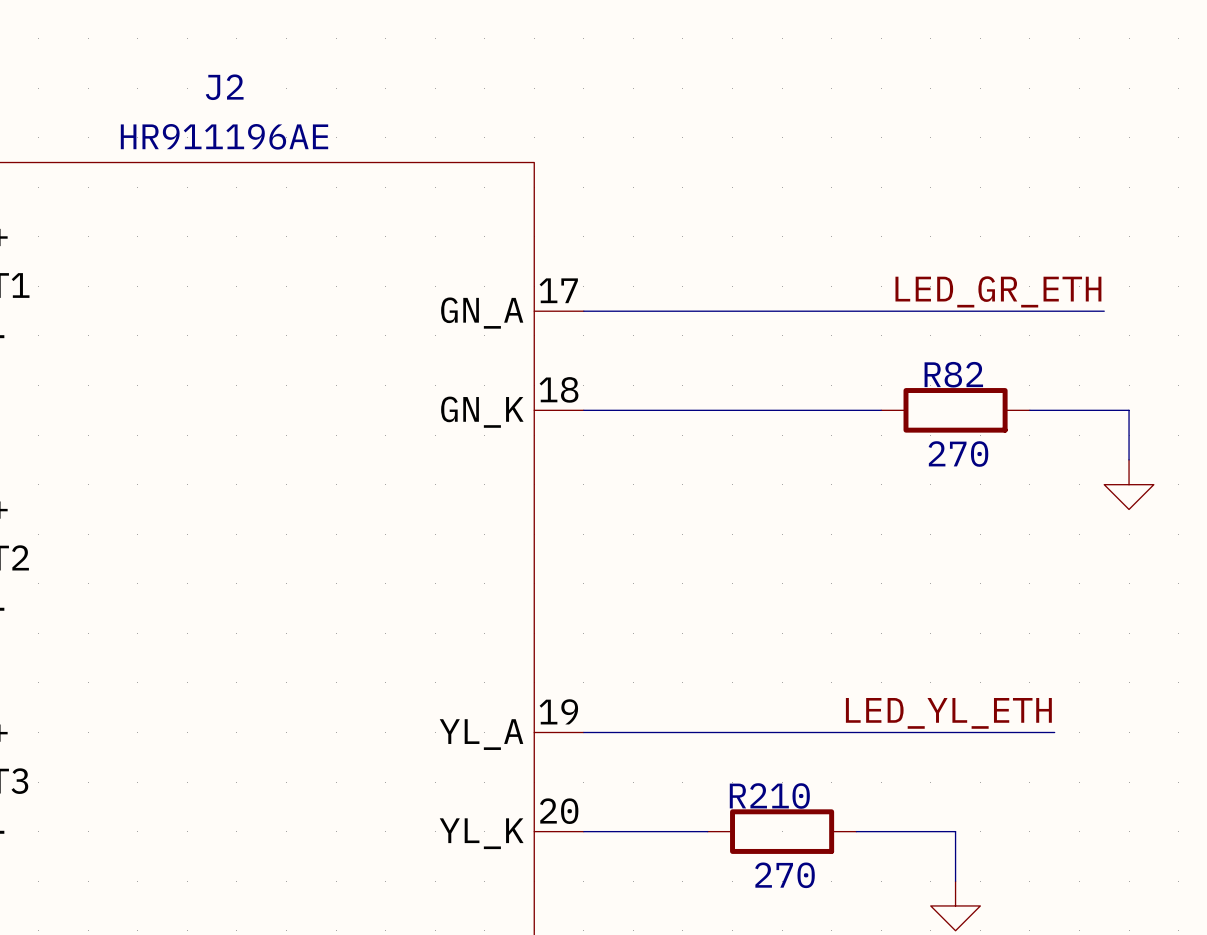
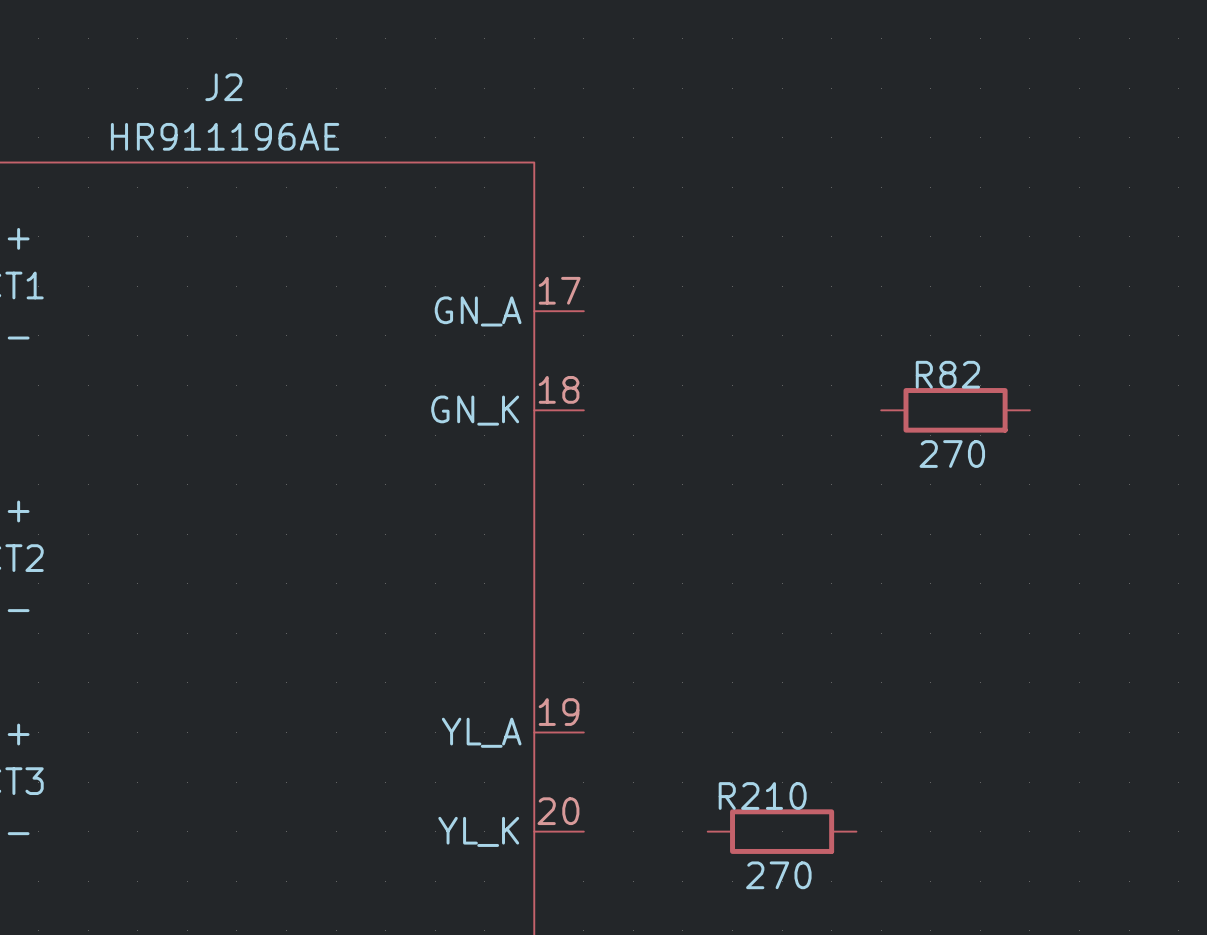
label: LED_GR_ETH (998, 291) -> none
wire: (583, 311) (1104, 311) -> none
wire: (583, 410) (881, 410) -> none
wire: (1029, 410) (1129, 410) (1129, 459) -> none
power symbol: (1129, 484) -> none
label: LED_YL_ETH (948, 713) -> none
wire: (583, 732) (1054, 732) -> none
wire: (583, 831) (707, 831) -> none
wire: (856, 831) (955, 831) (955, 881) -> none
power symbol: (955, 905) -> none

